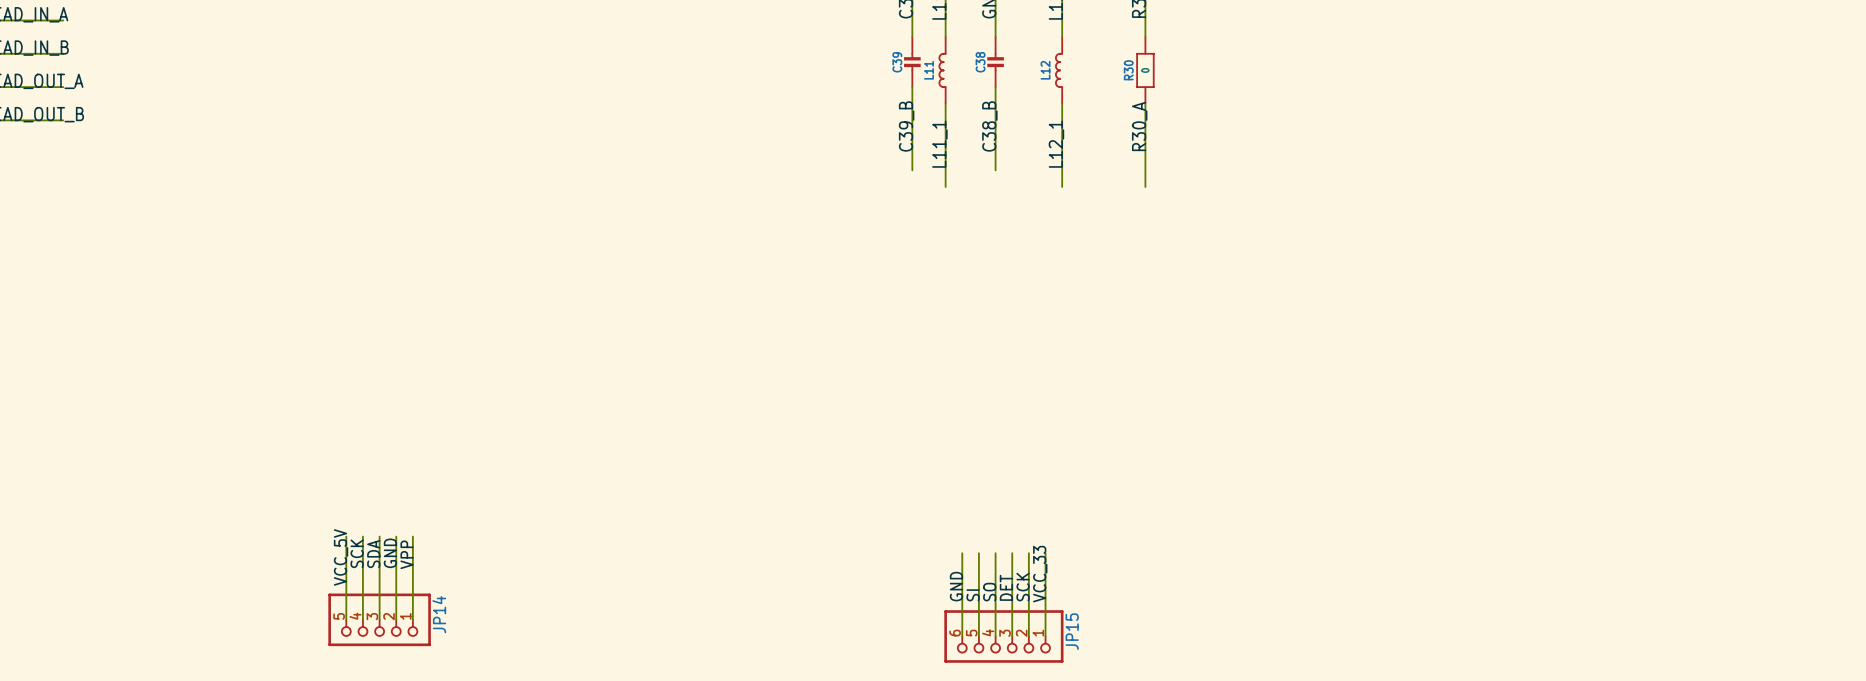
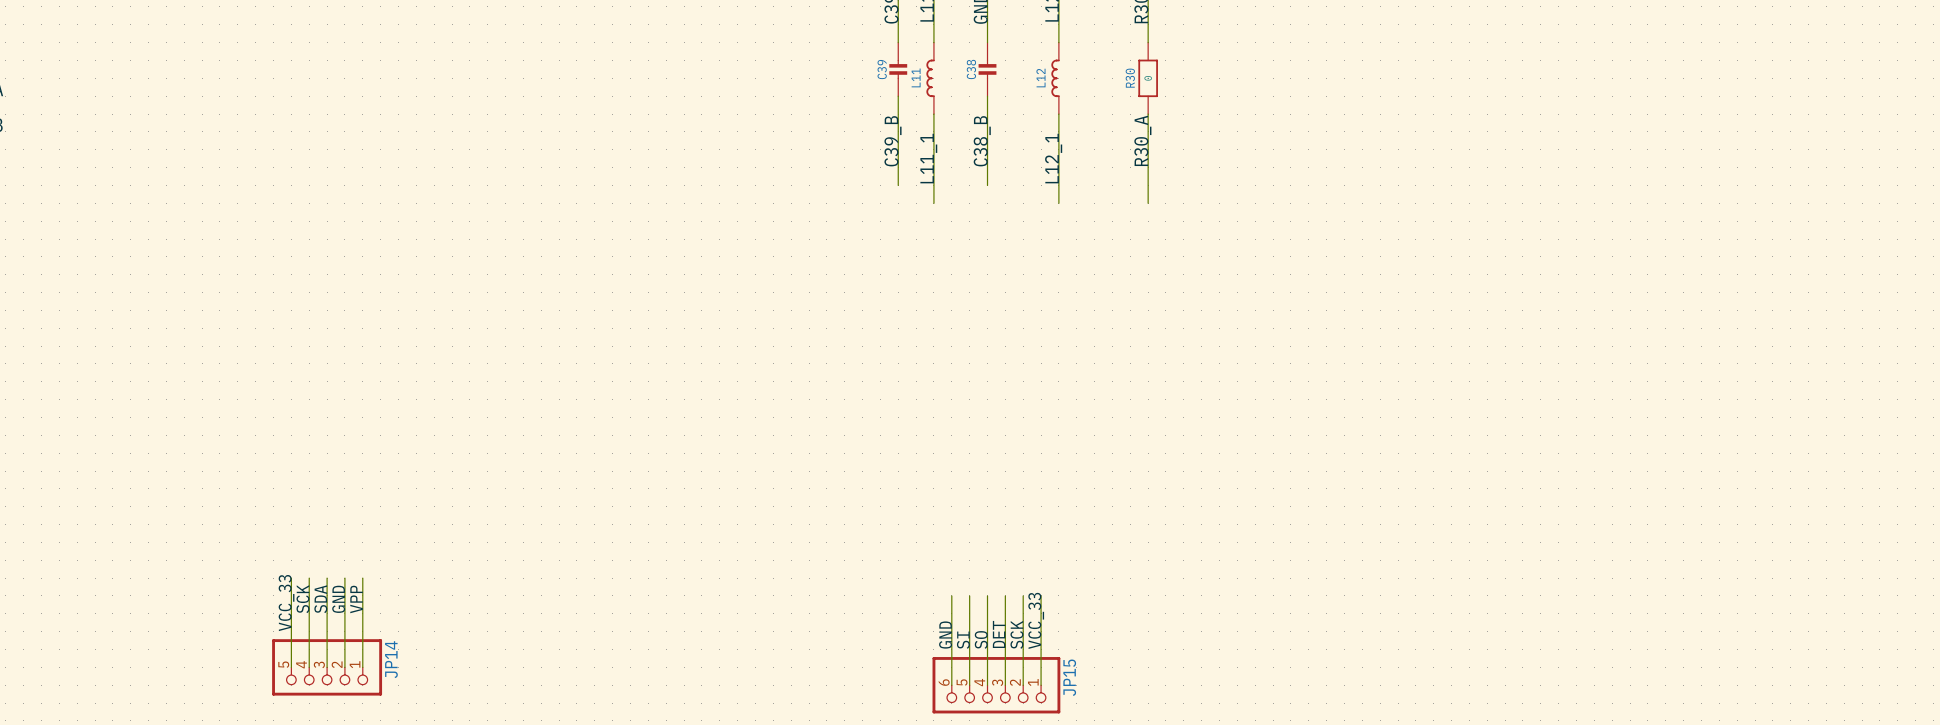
label: VCC_5V (341, 557) -> VCC_33 (286, 603)

